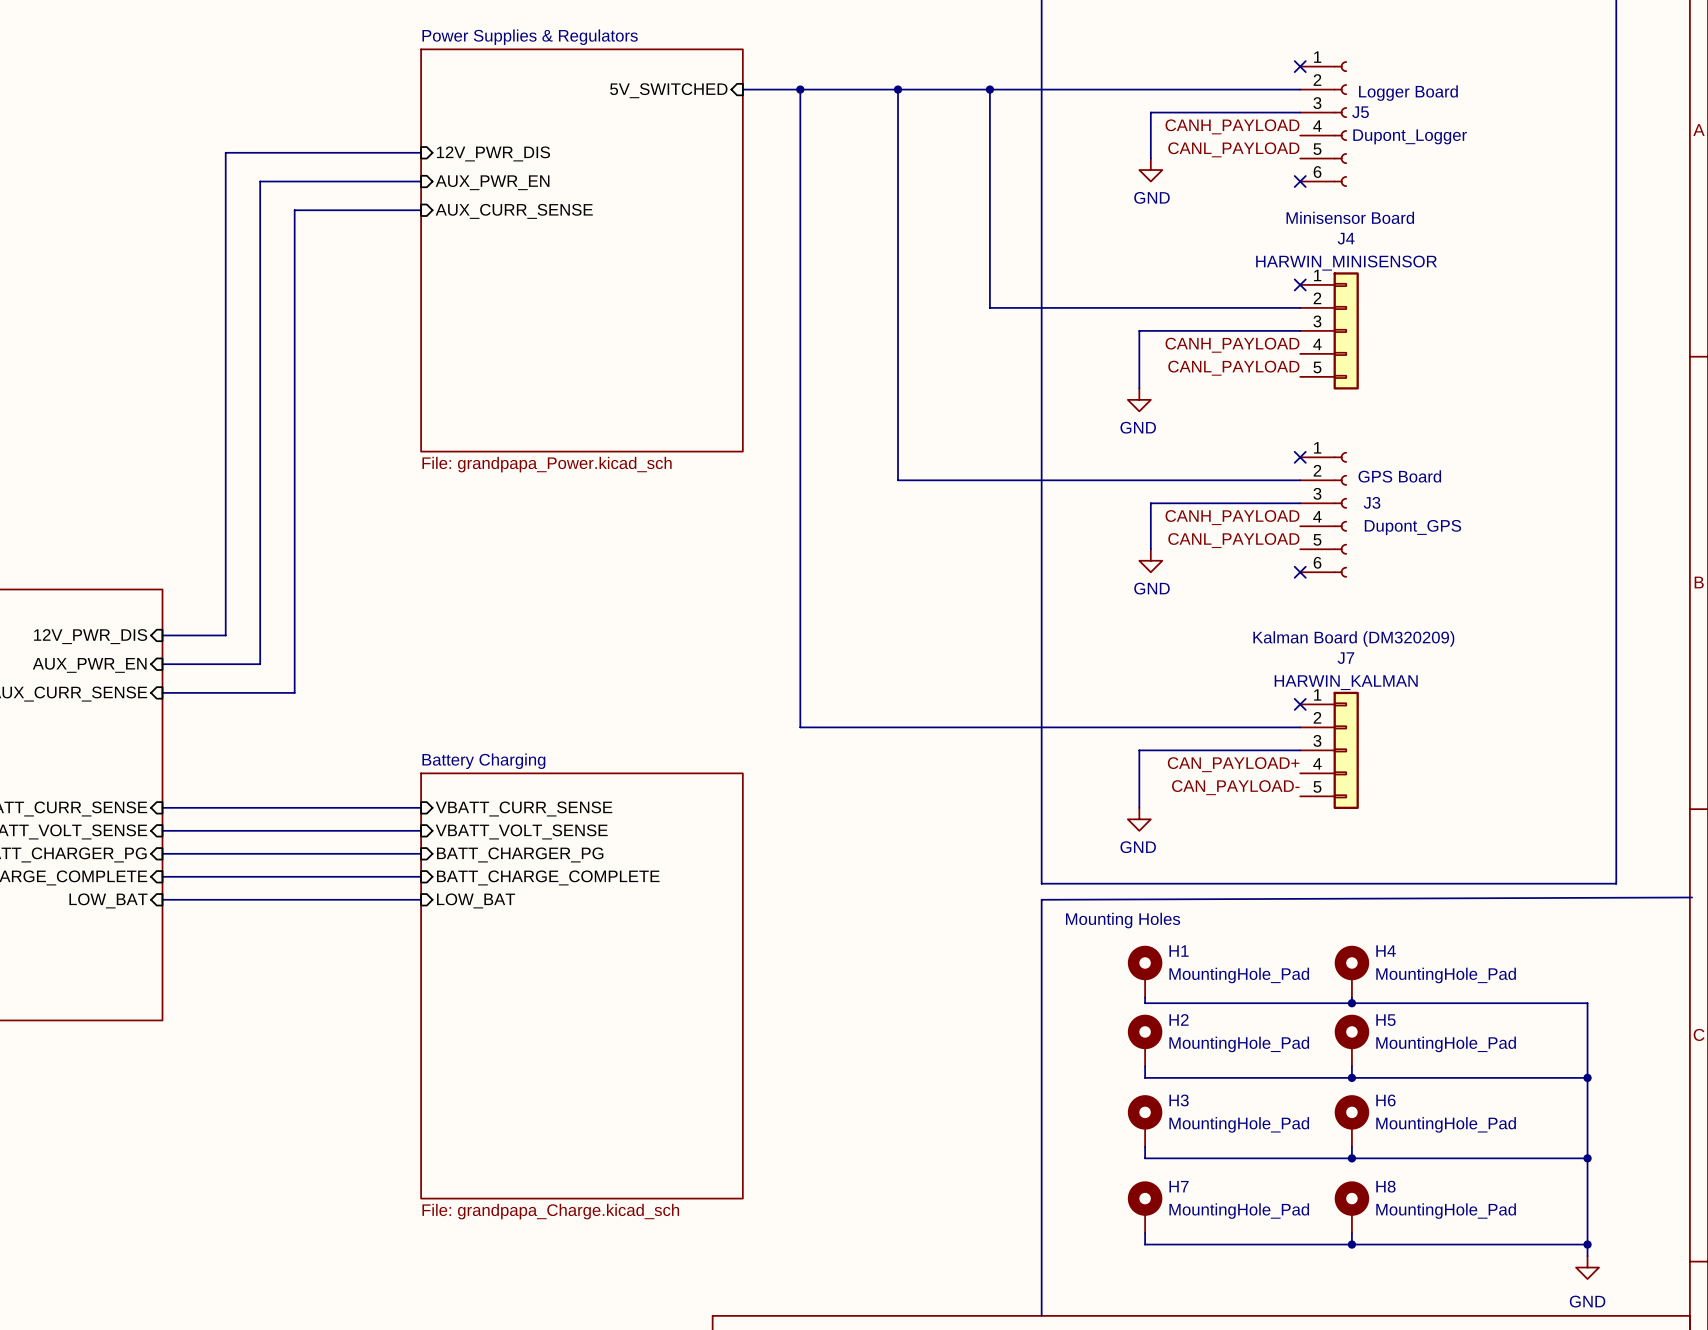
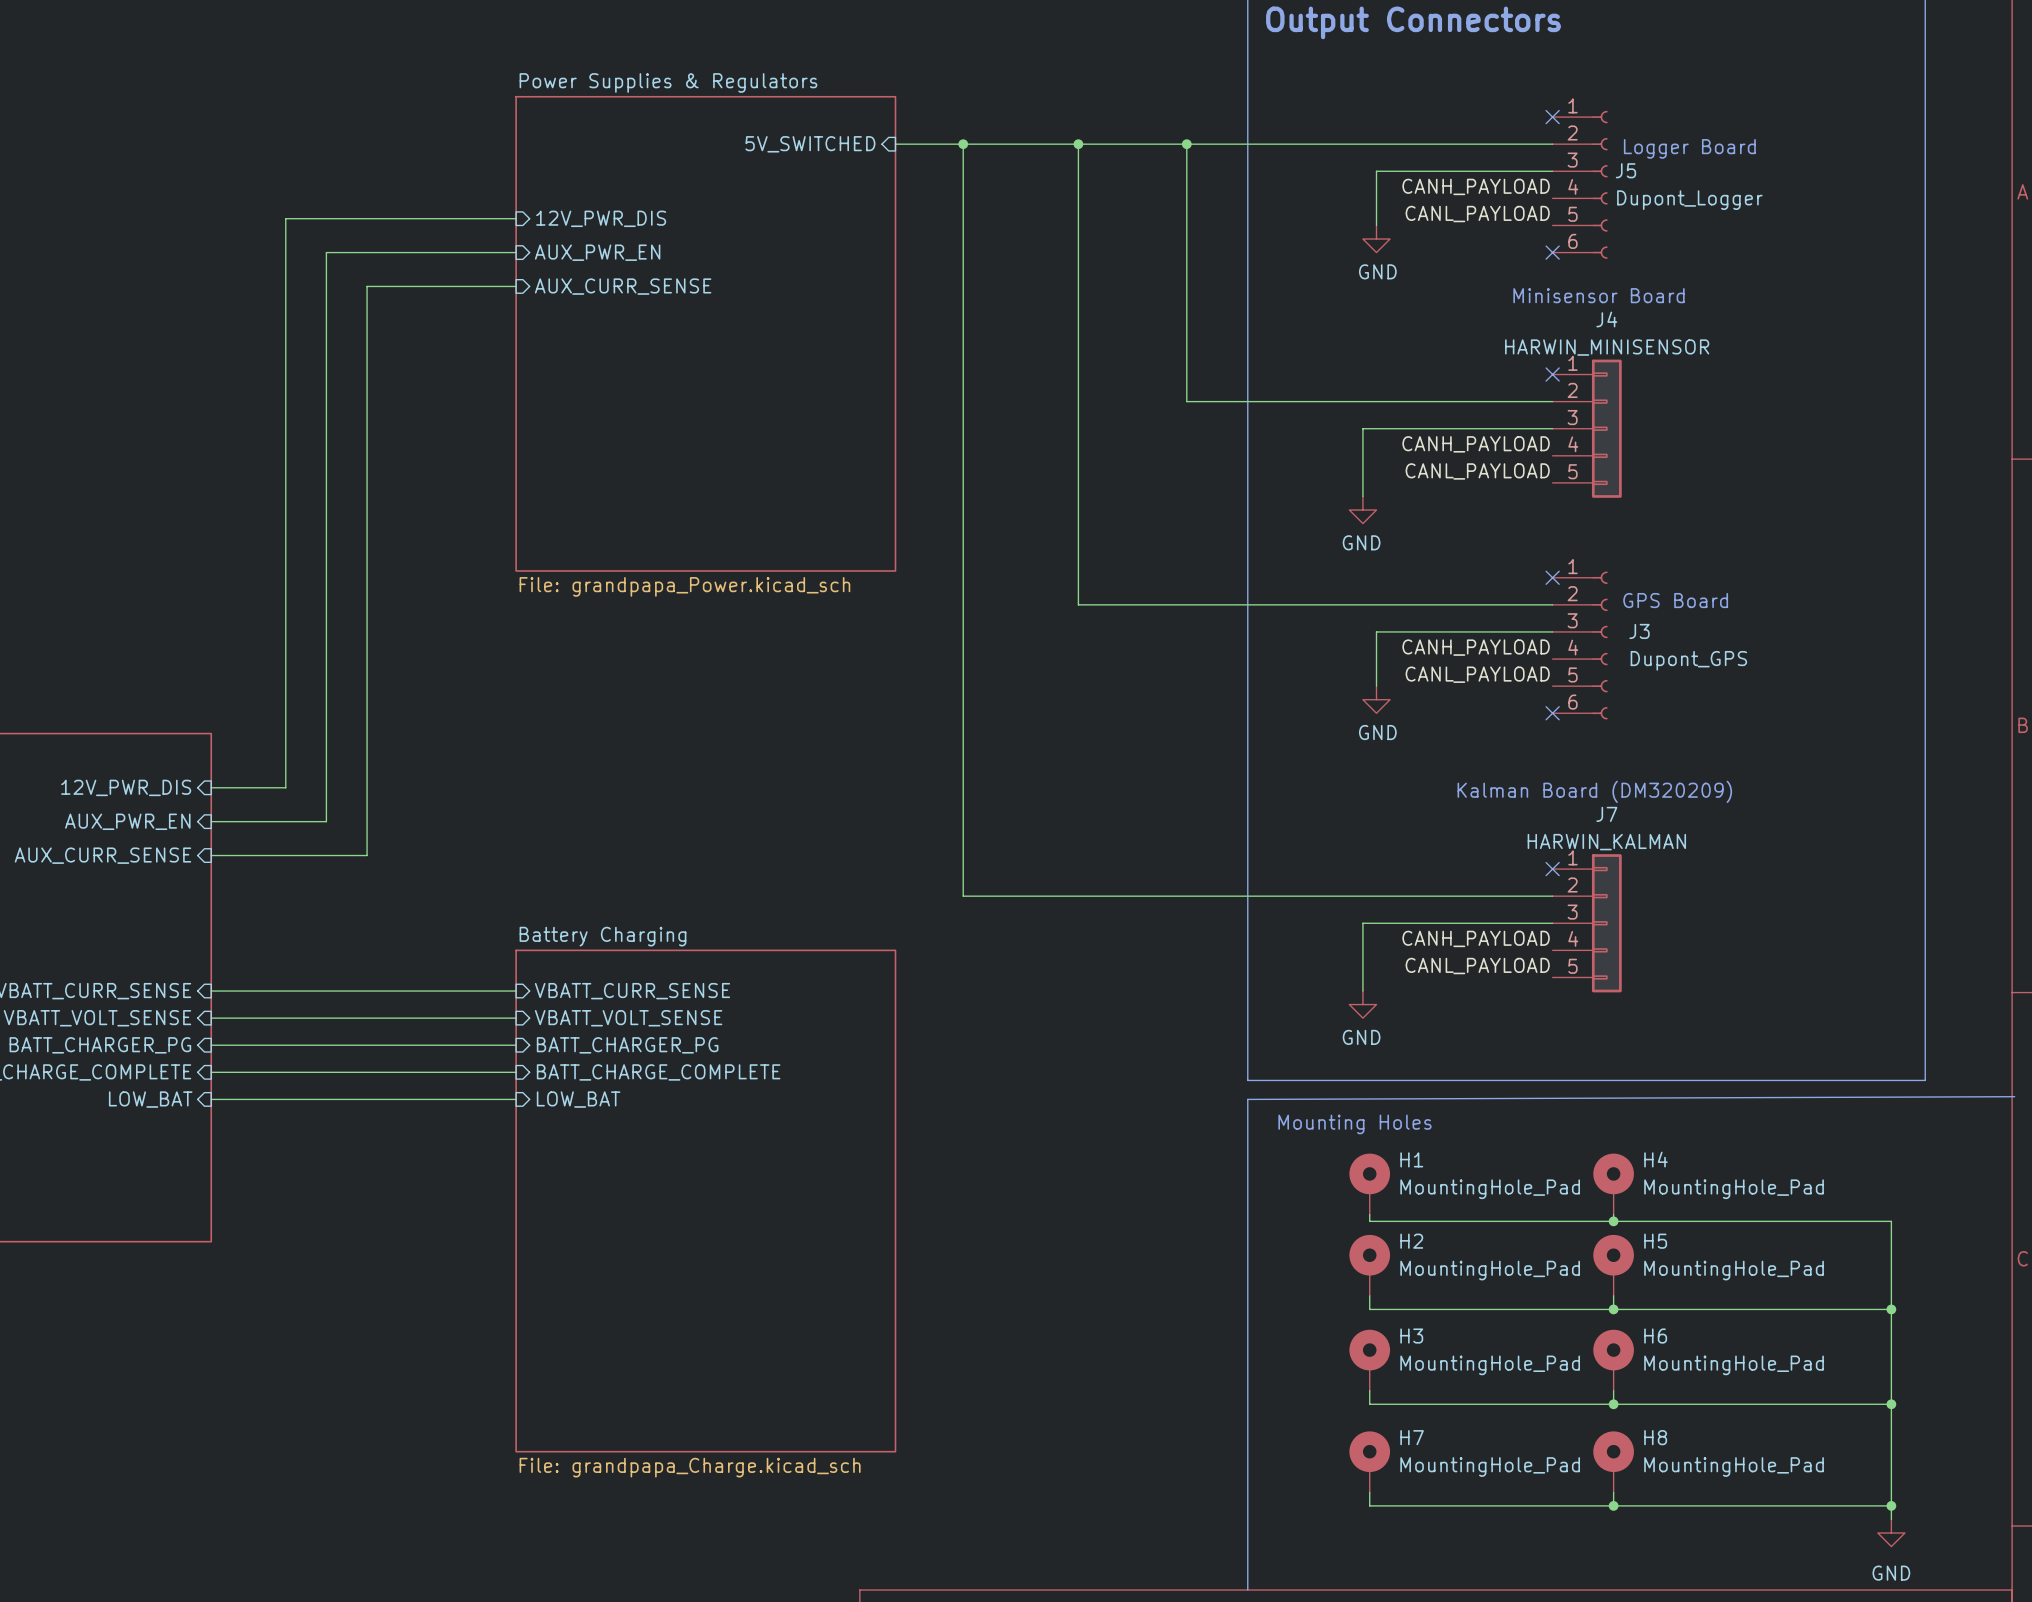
label: CAN_PAYLOAD+ (1233, 764) -> CANH_PAYLOAD (1476, 938)
label: CAN_PAYLOAD- (1235, 787) -> CANL_PAYLOAD (1477, 966)

